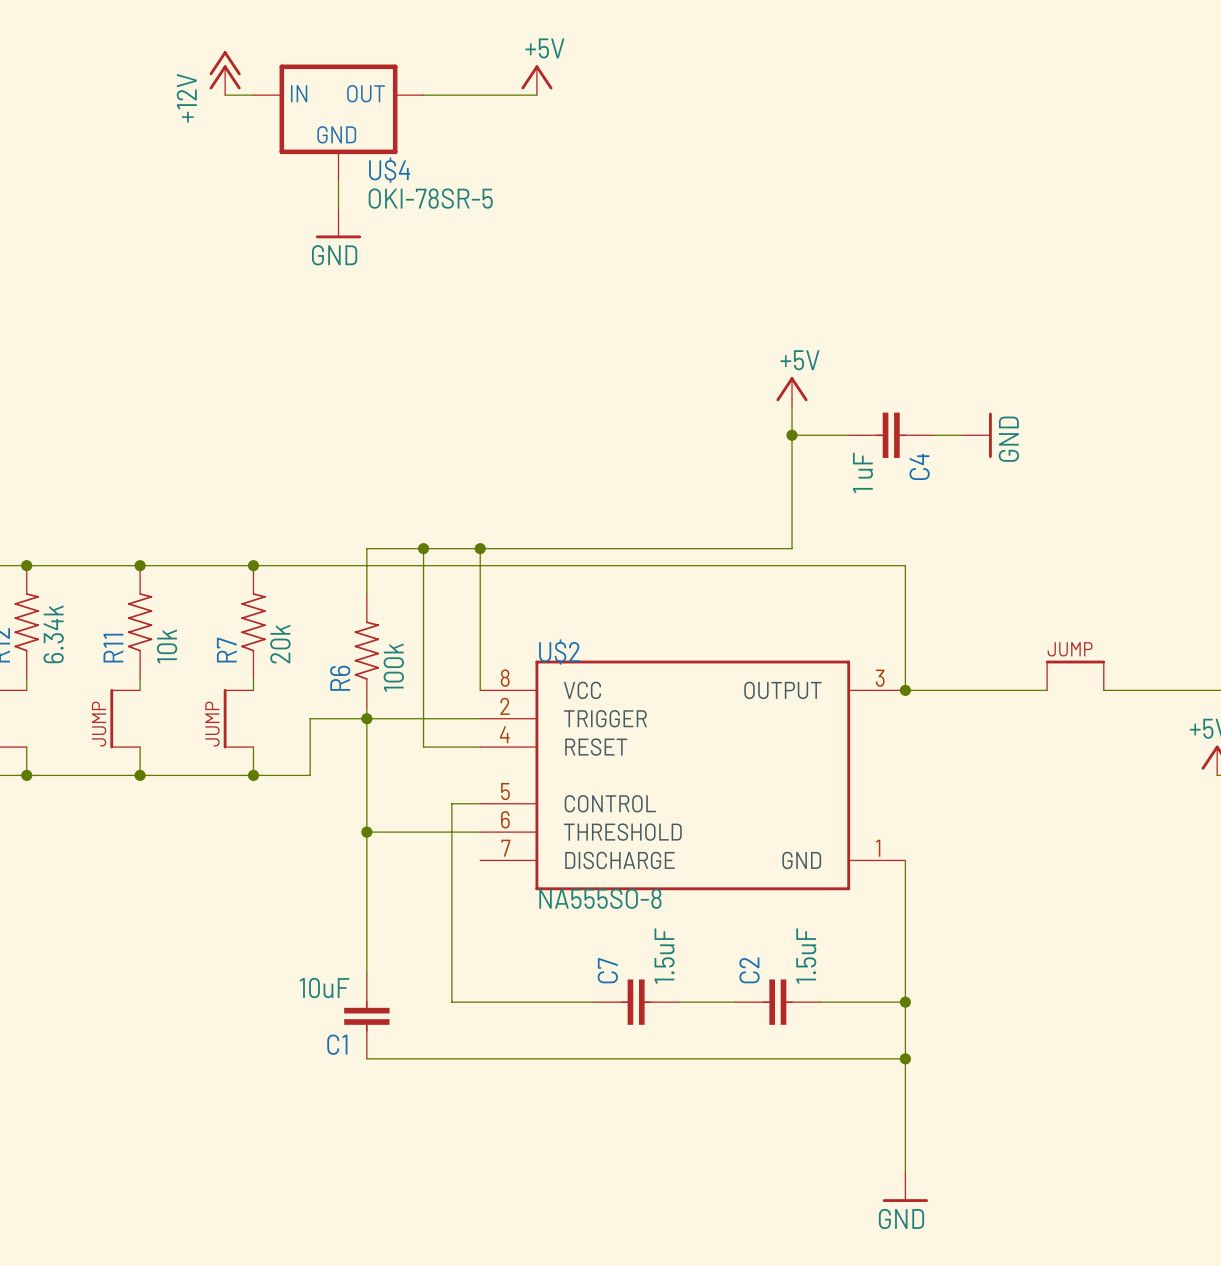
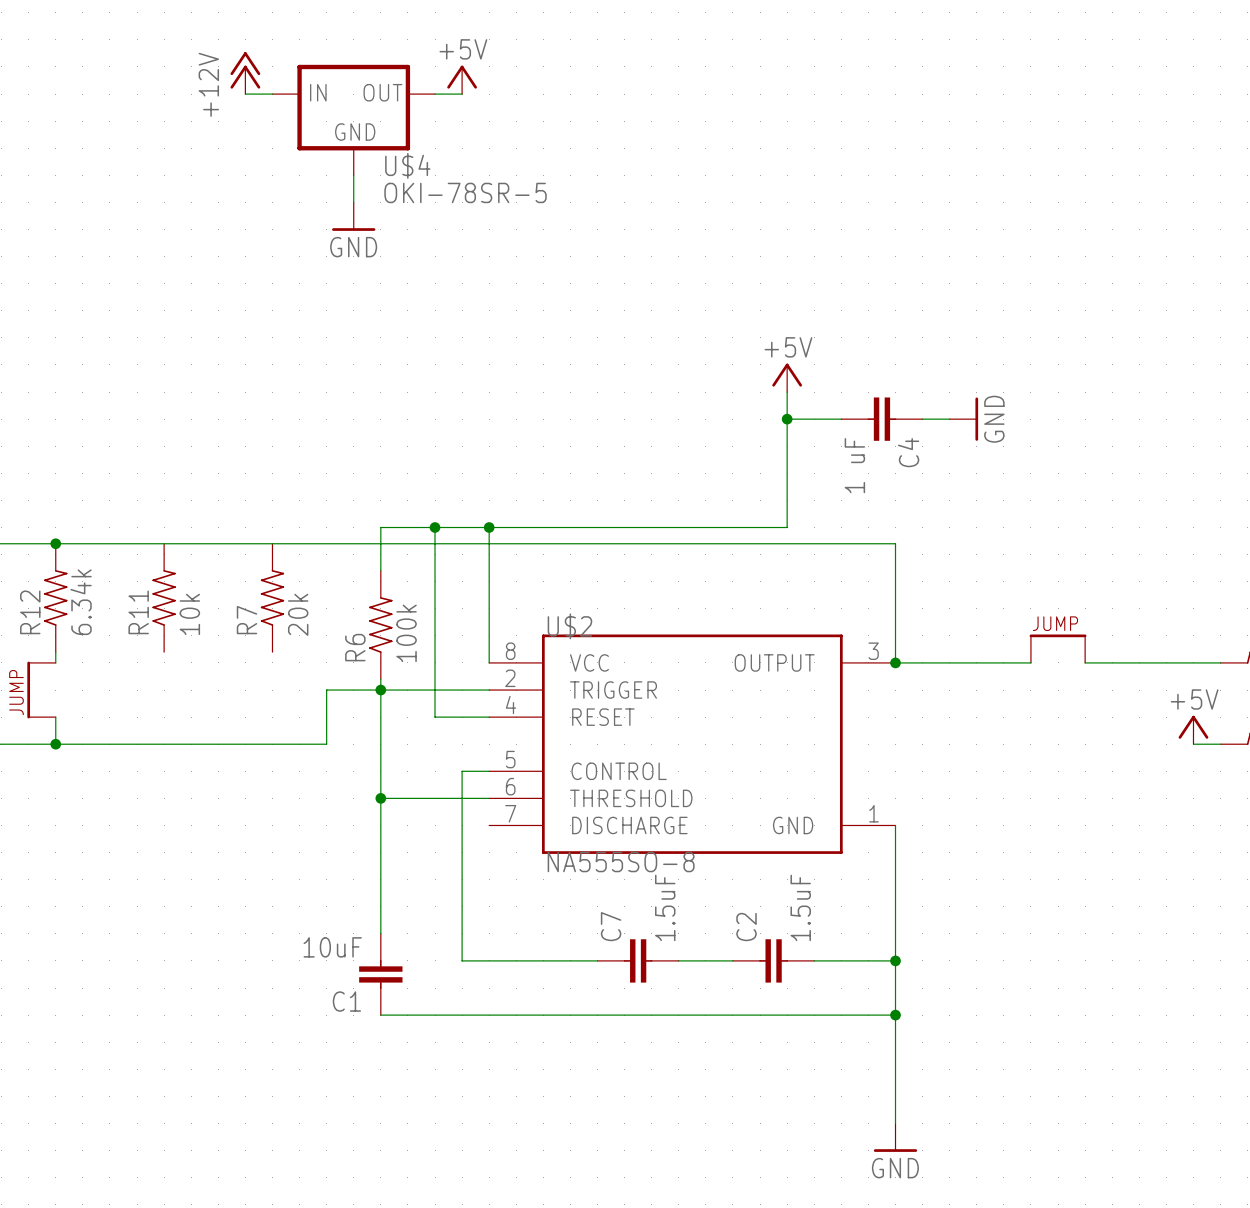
power symbol position: +5V (536, 80) -> +5V (462, 79)
wire: (451, 95) (536, 95) -> none
junction: (140, 565) -> none
junction: (253, 565) -> none
wire: (140, 679) (140, 690) -> none
wire: (253, 679) (253, 690) -> none
part: (125, 718) -> none
part: (238, 718) -> none
wire: (140, 747) (140, 775) -> none
wire: (253, 747) (253, 775) -> none
junction: (140, 775) -> none
junction: (253, 775) -> none

